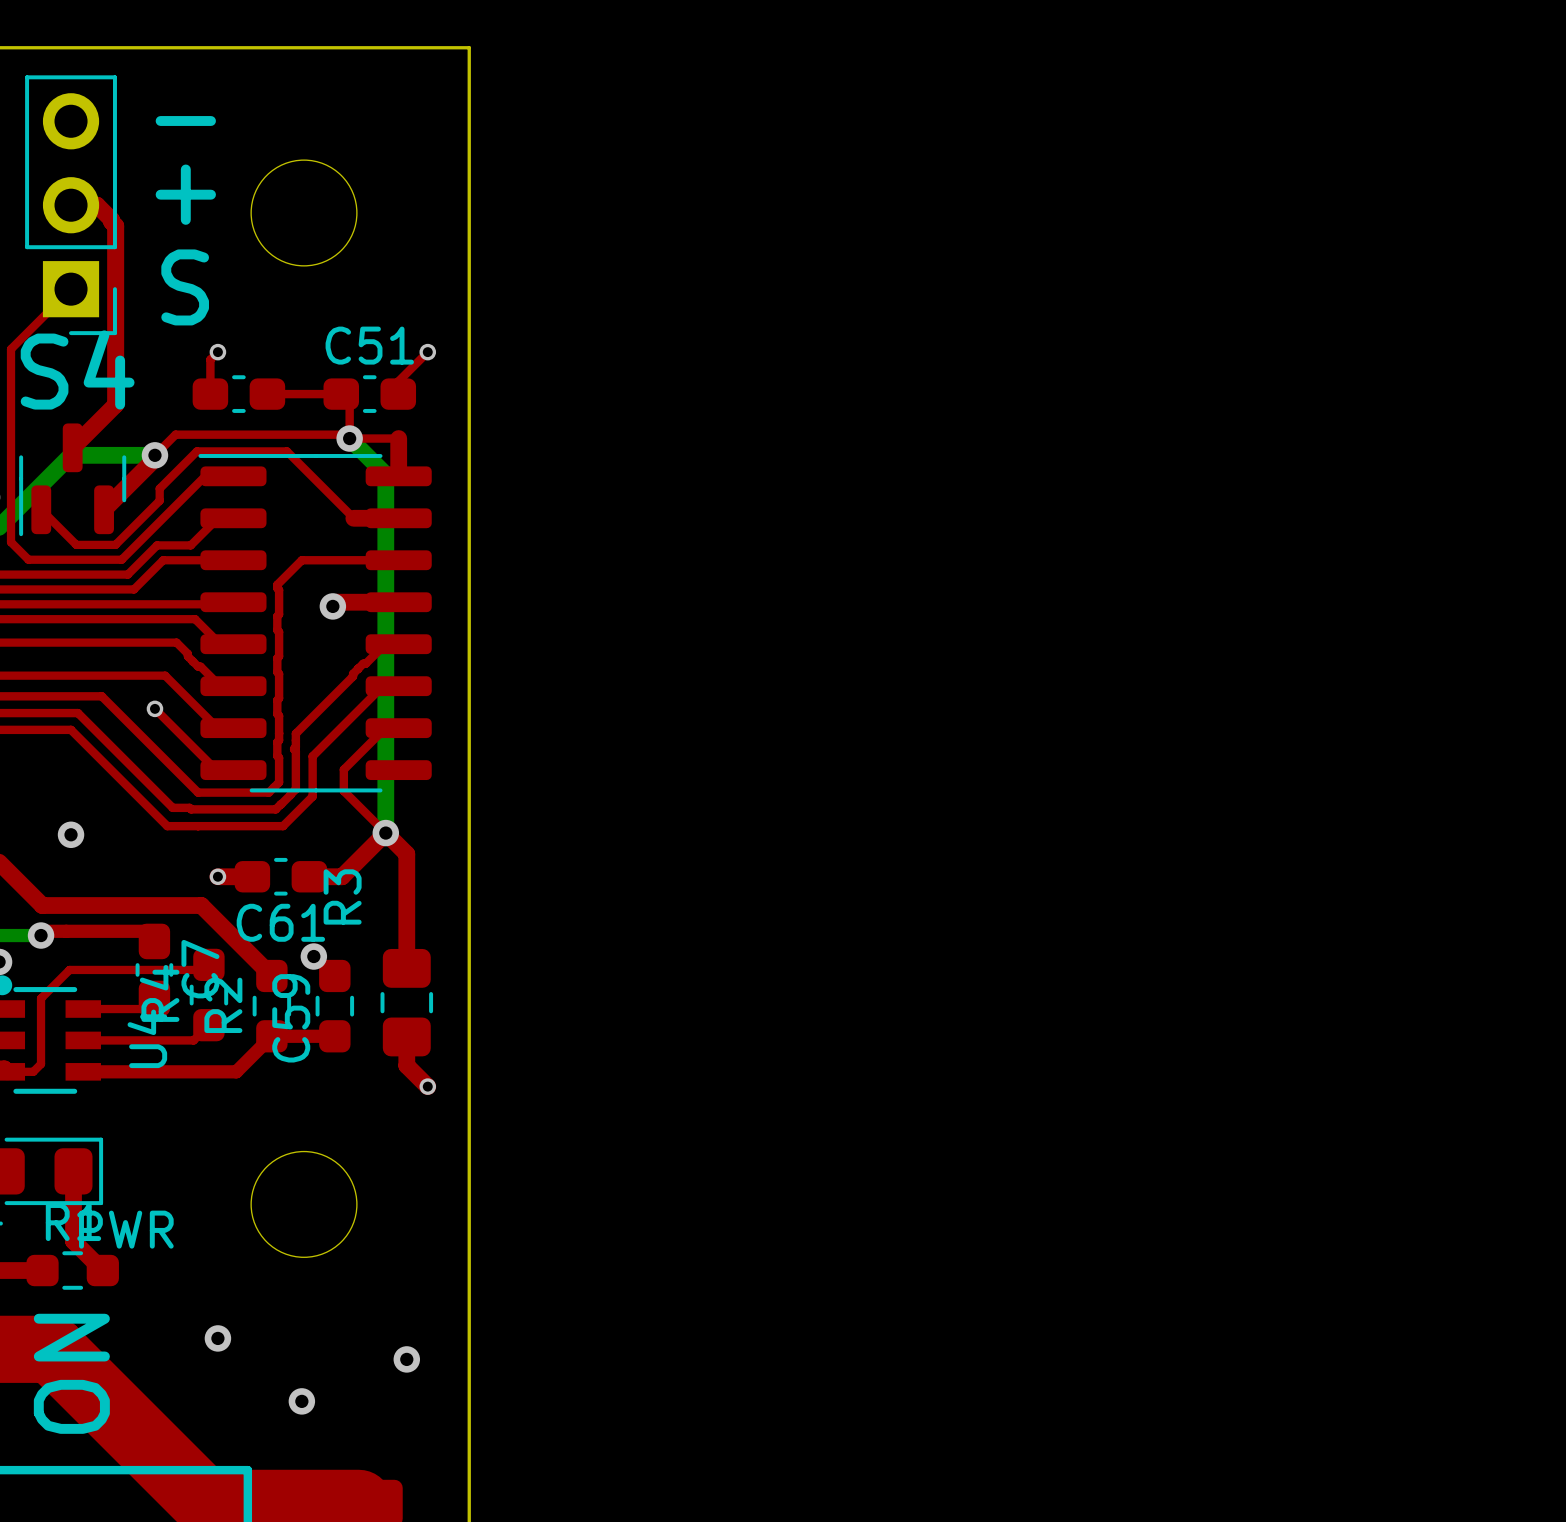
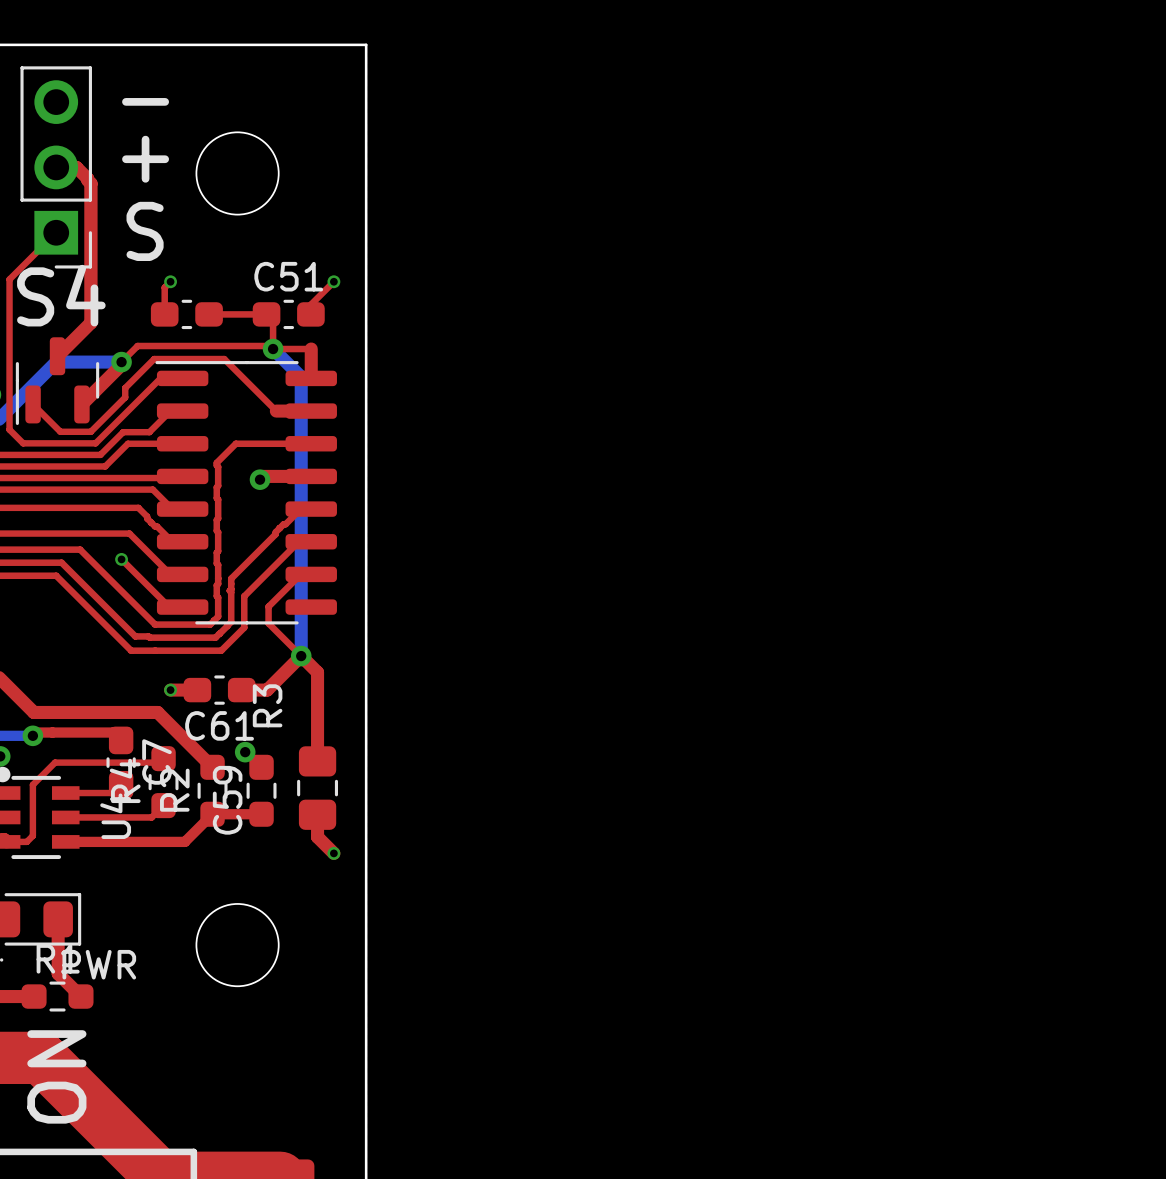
via: (71, 834) -> none
via: (217, 1338) -> none
via: (406, 1359) -> none
via: (301, 1401) -> none

